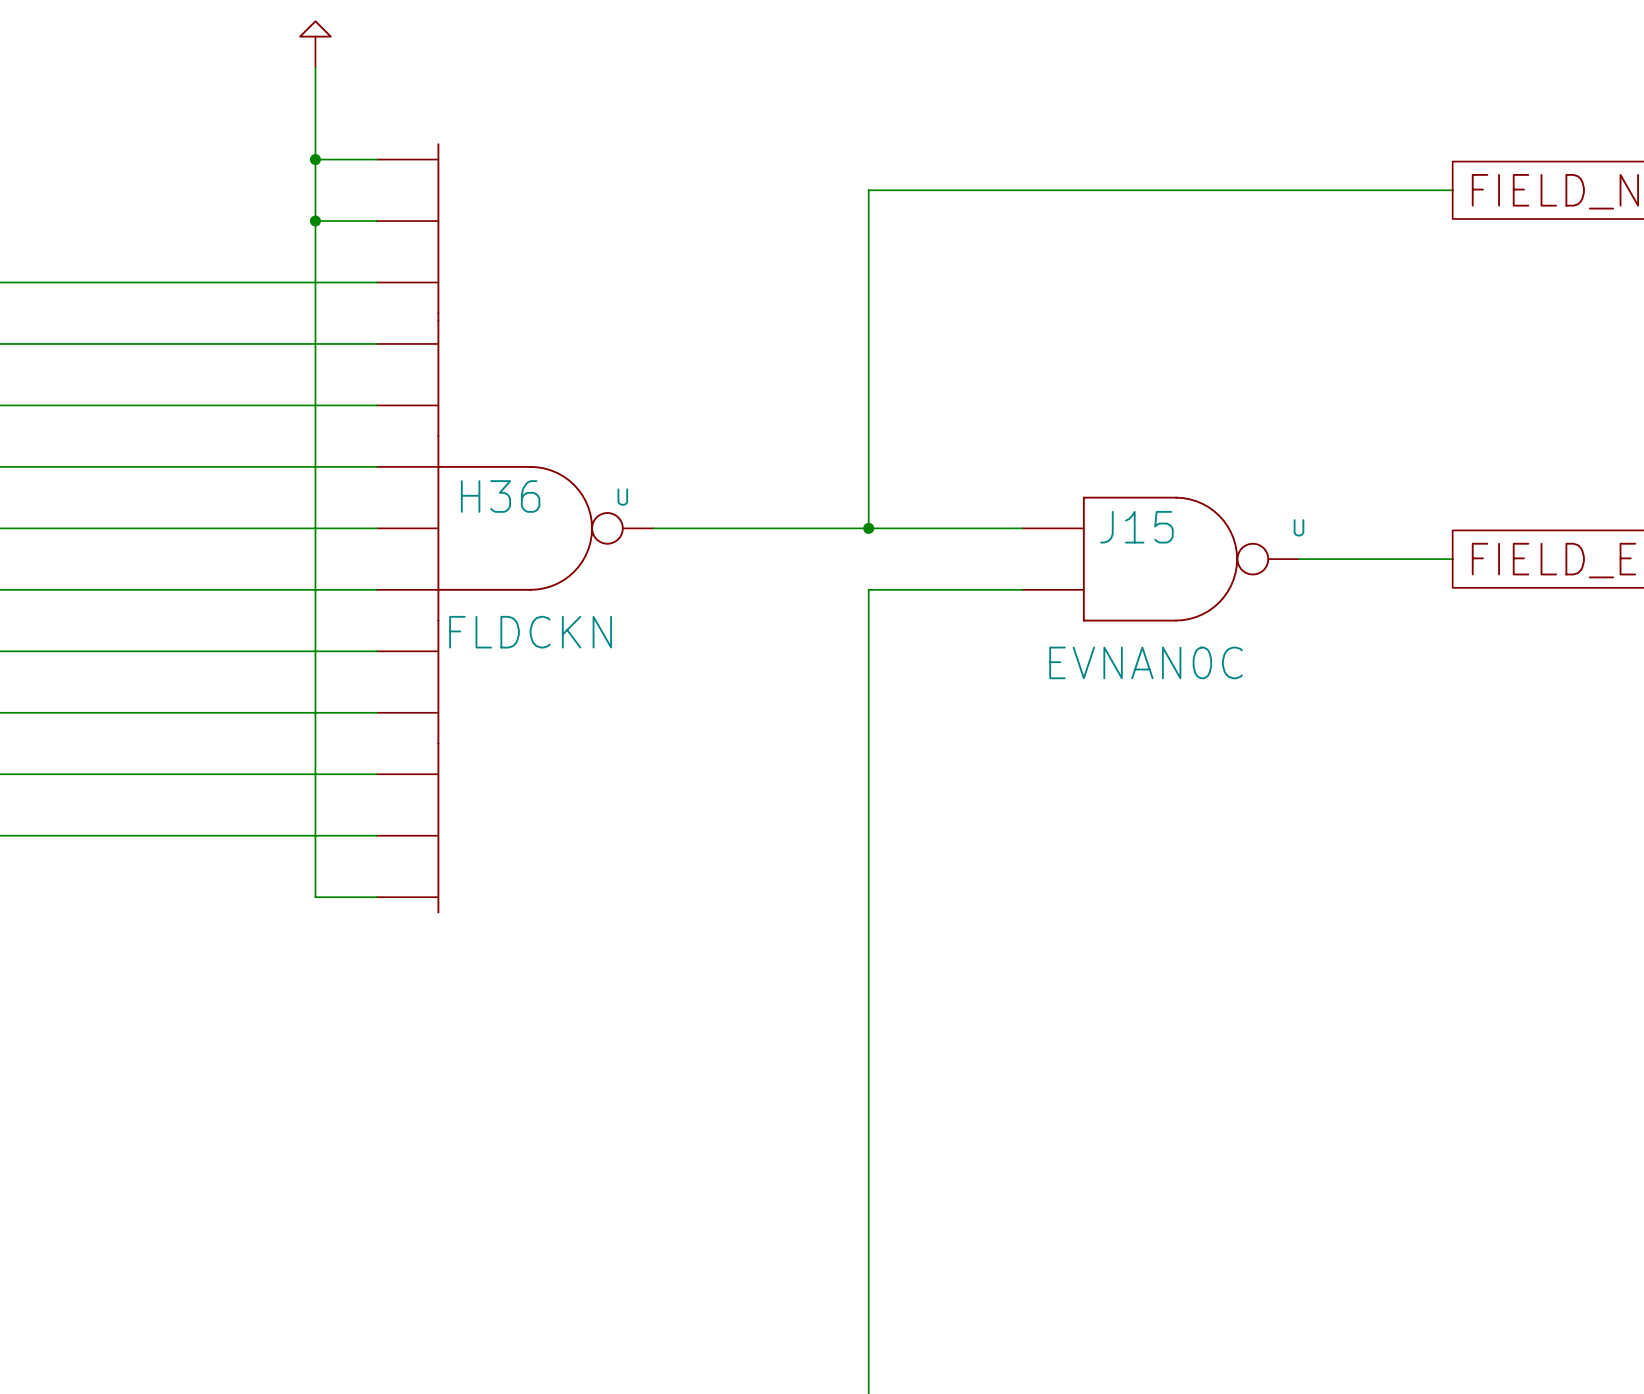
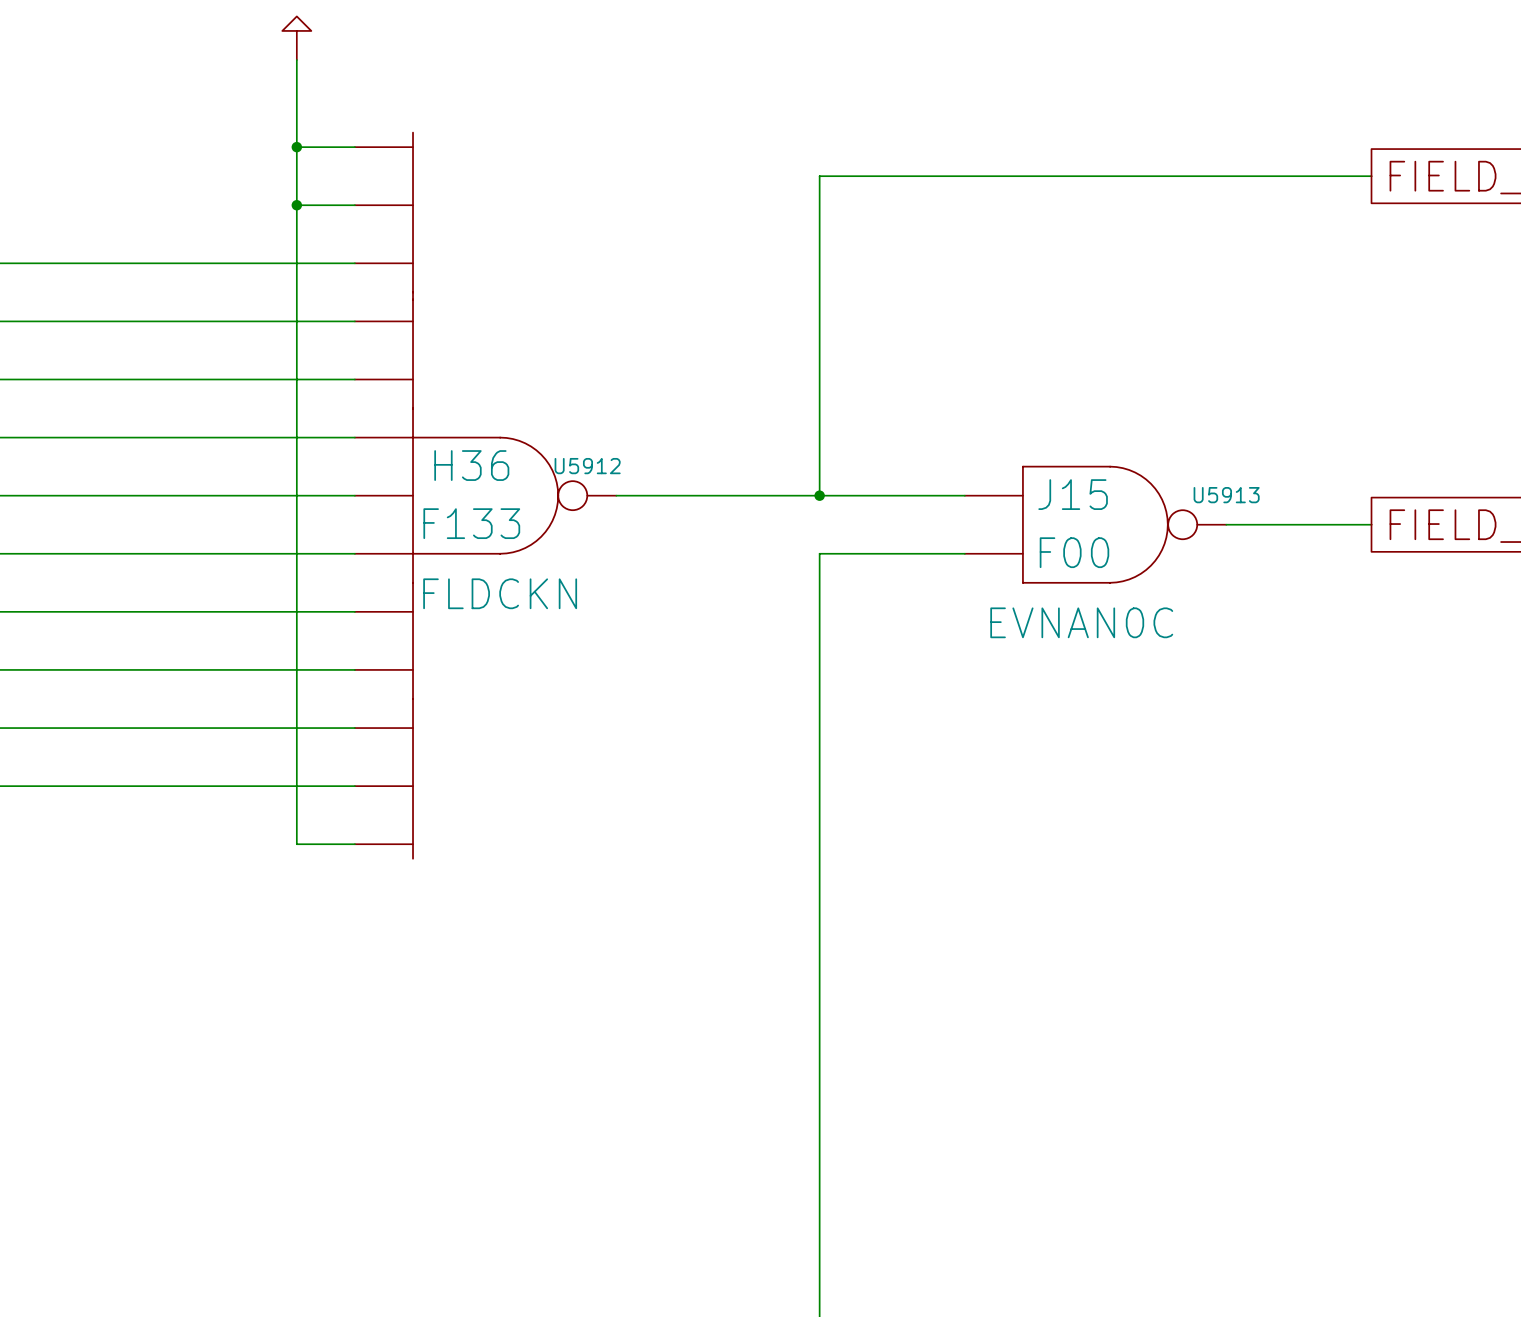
U name: U (622, 497) -> U5912 (587, 466)
U name: U (1298, 527) -> U5913 (1226, 495)
U value: none -> F133 (471, 523)
U value: none -> F00 (1074, 552)

